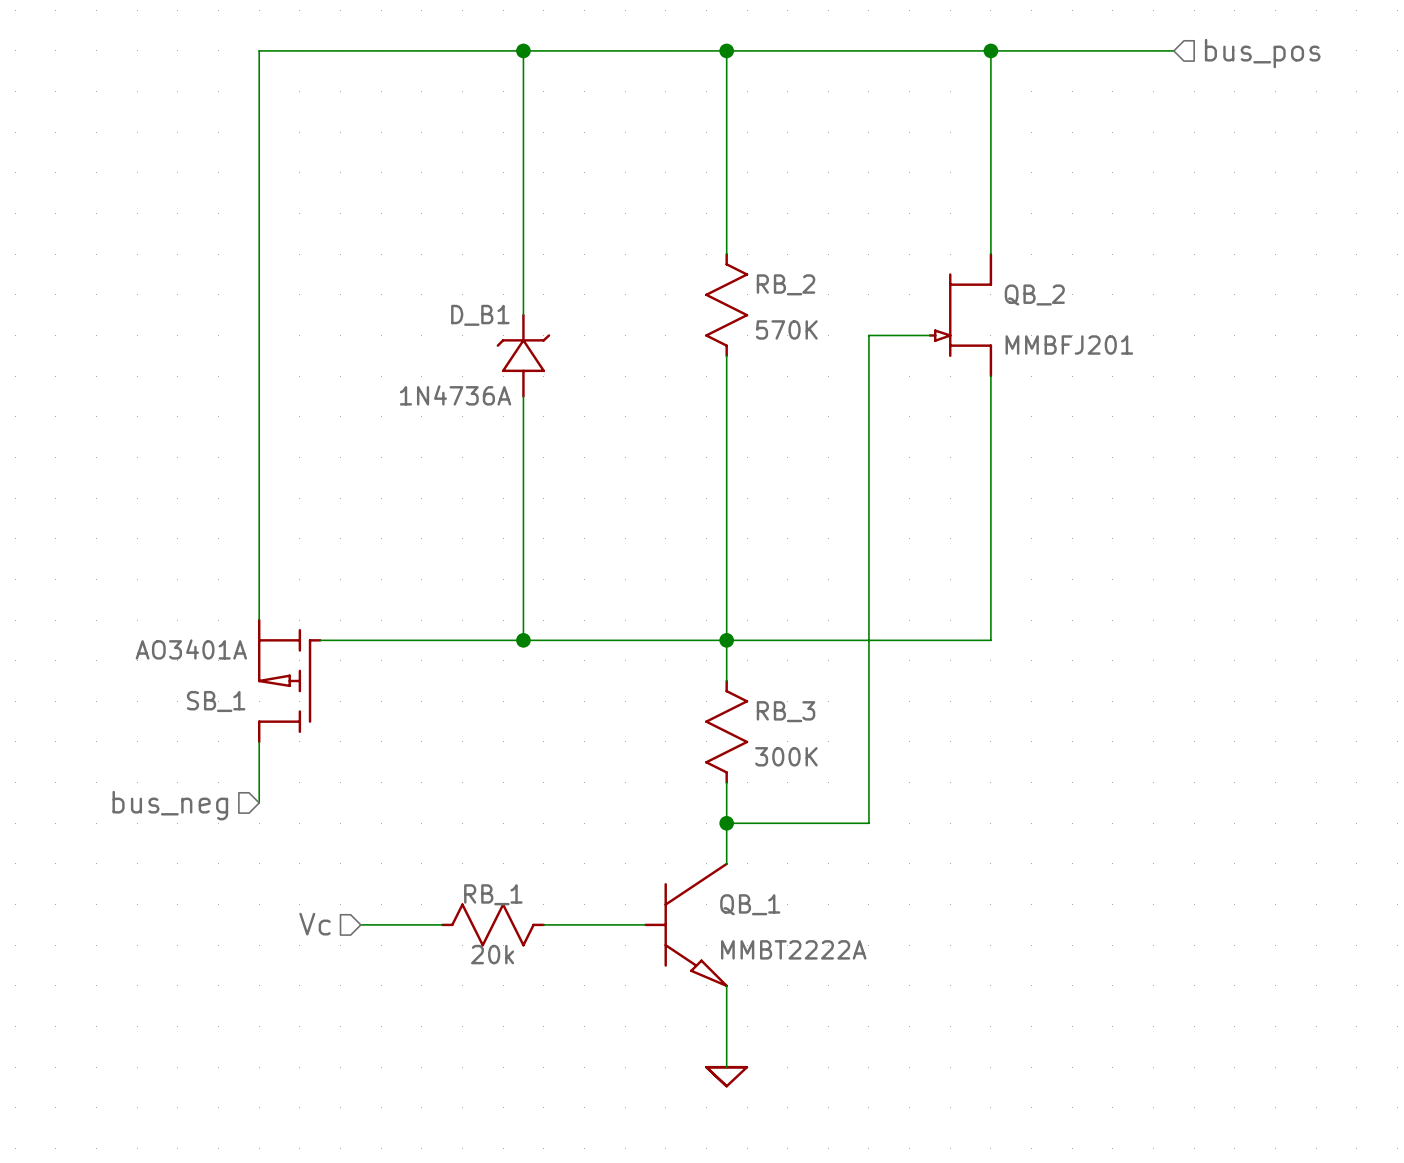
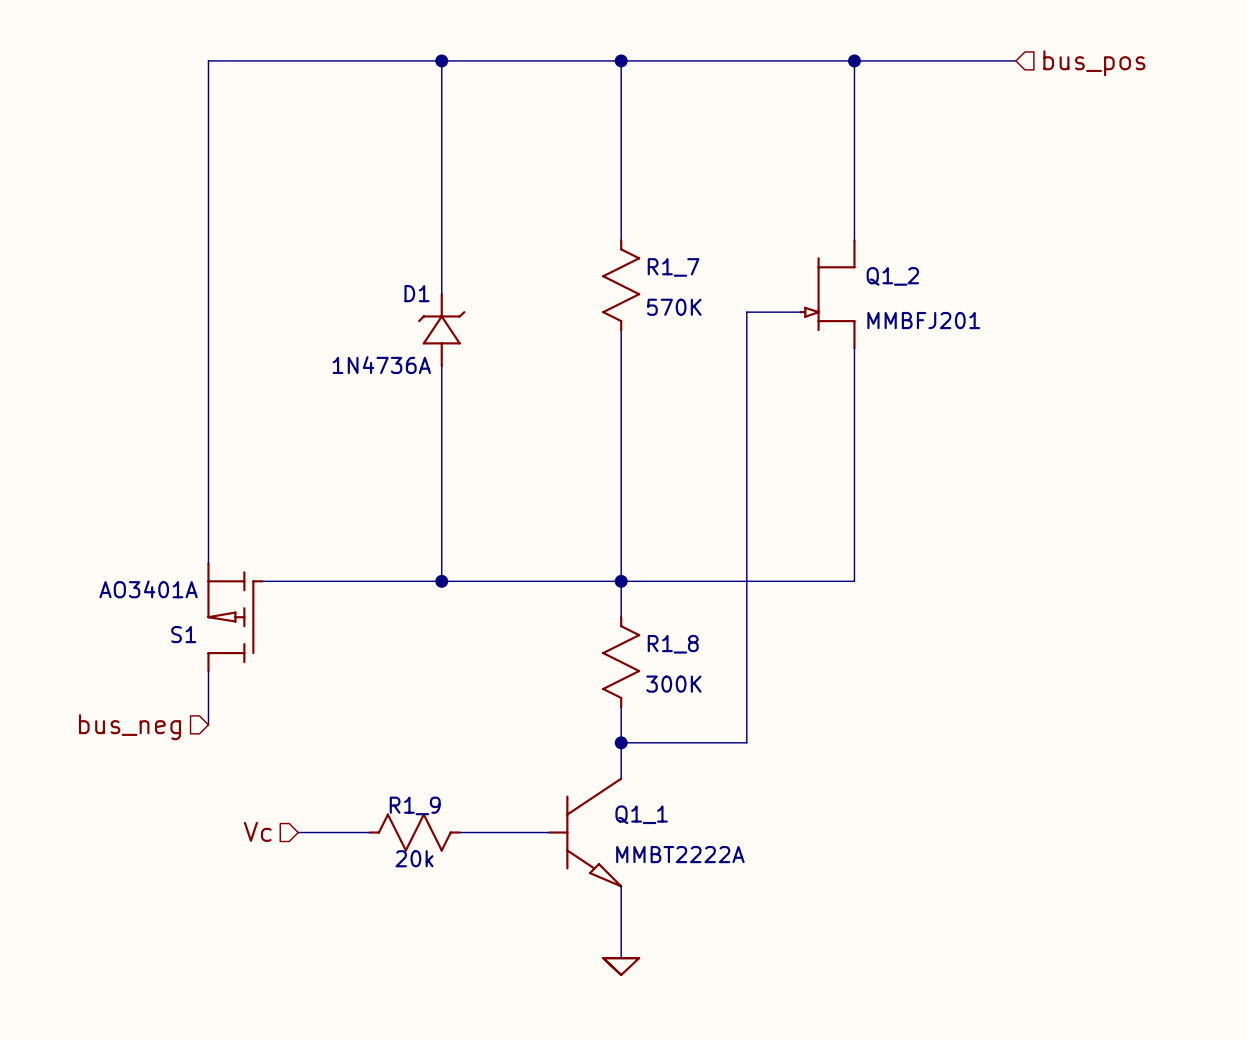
RB_2 name: RB_2 (786, 284) -> R1_7 (673, 267)
QB_2 name: QB_2 (1034, 295) -> Q1_2 (892, 276)
D_B1 name: D_B1 (480, 315) -> D1 (417, 293)
SB_1 name: SB_1 (216, 701) -> S1 (183, 634)
RB_3 name: RB_3 (786, 711) -> R1_8 (673, 644)
RB_1 name: RB_1 (493, 894) -> R1_9 (415, 805)
QB_1 name: QB_1 (750, 904) -> Q1_1 (641, 814)

